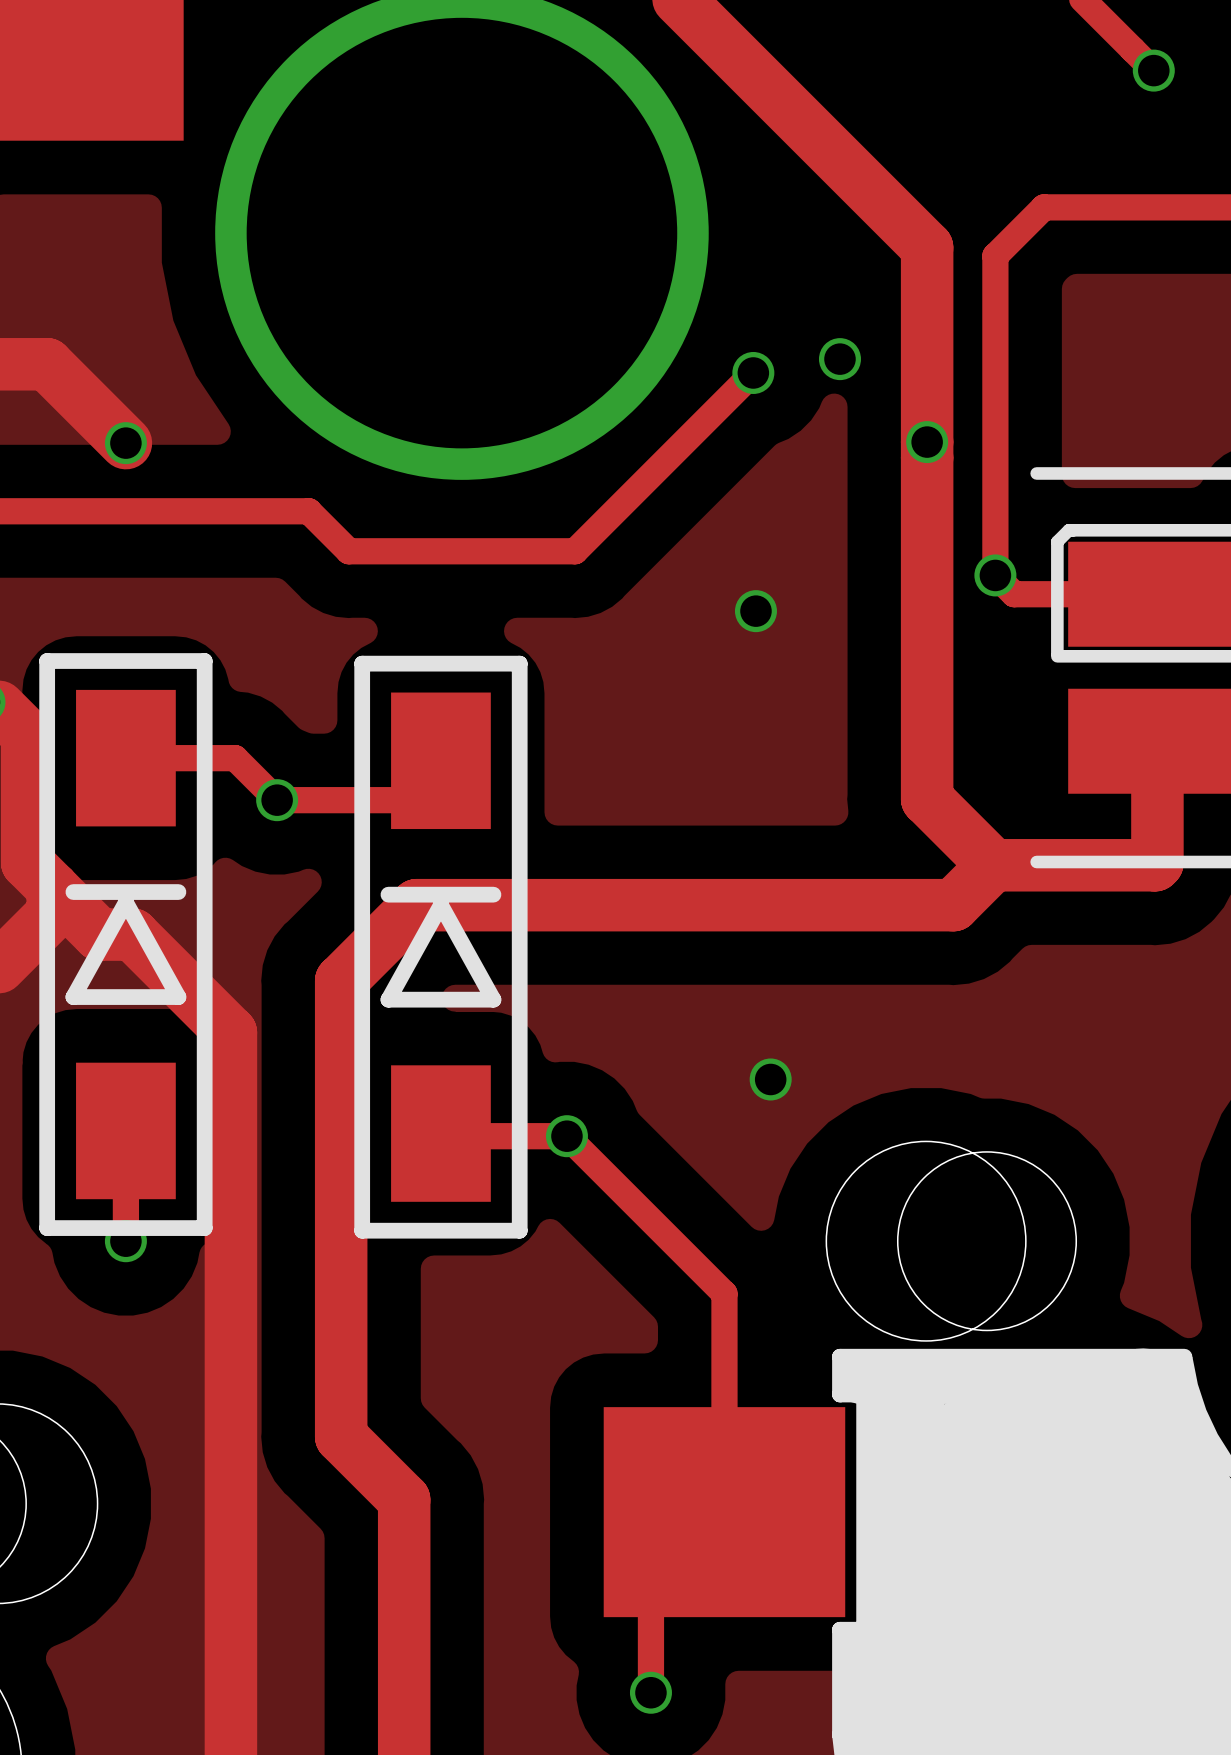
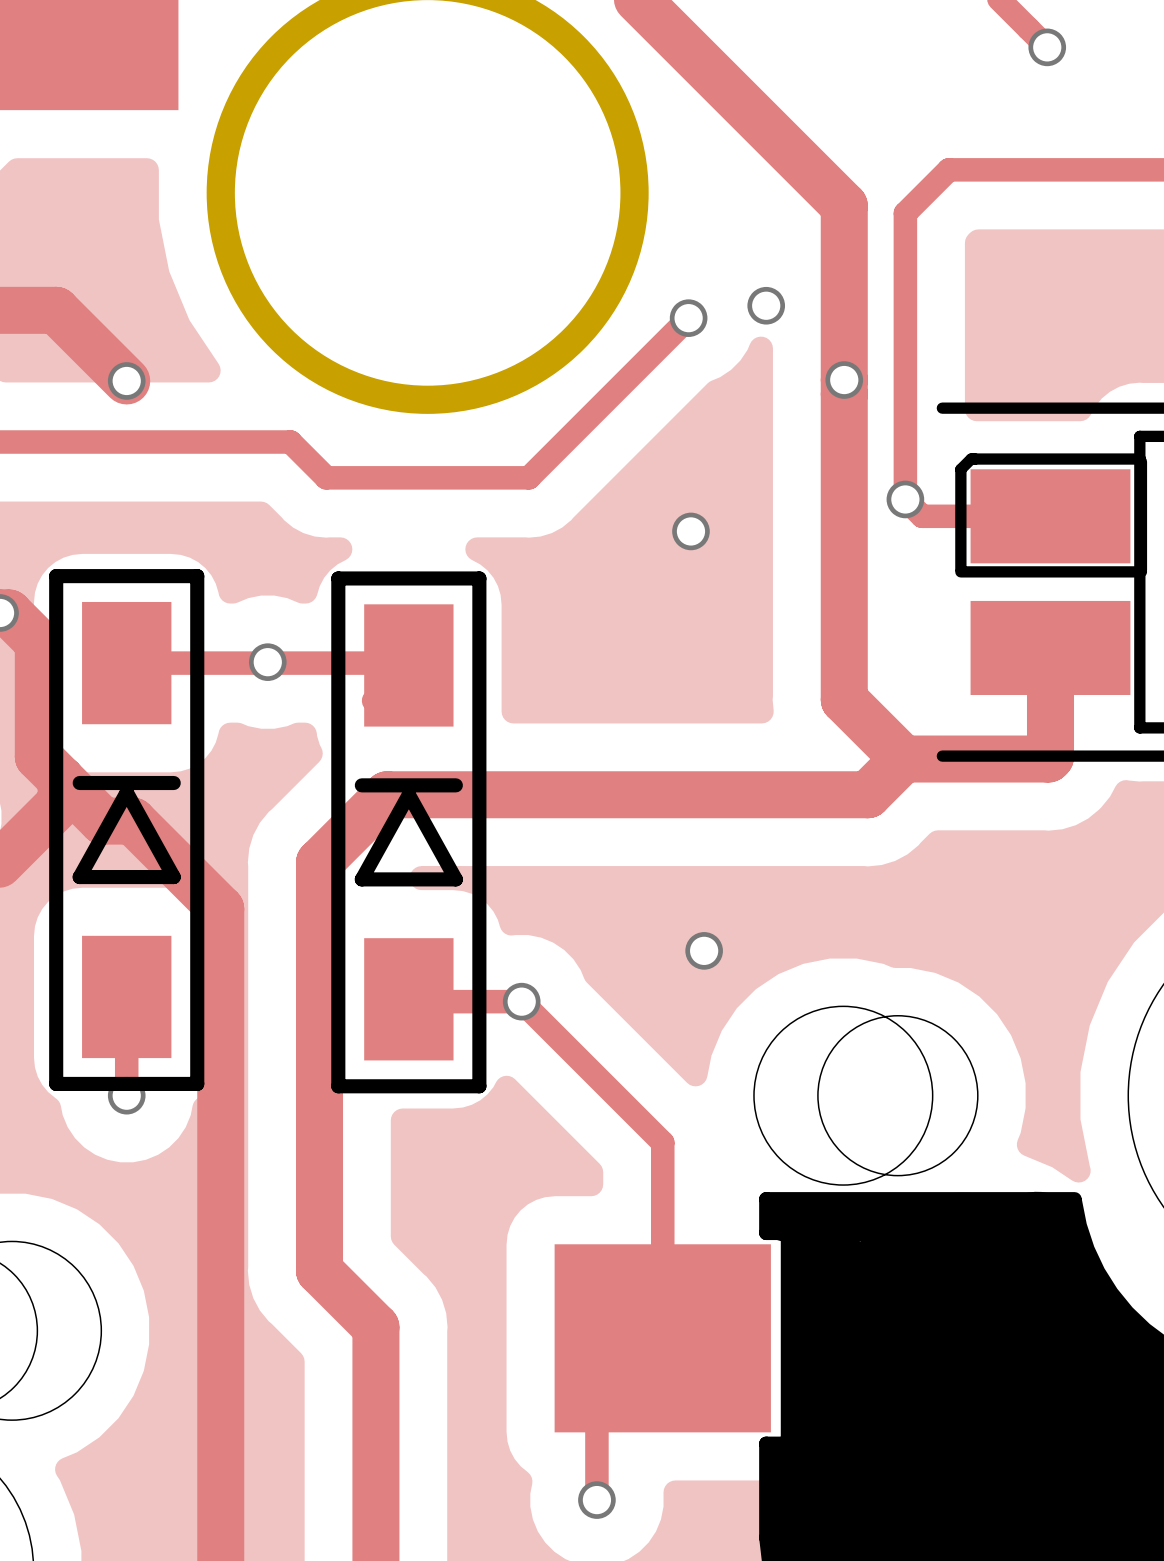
track: (235, 758) (277, 800) (401, 800) -> (224, 663) (406, 663) (408, 665)
via position: (277, 800) -> (267, 662)

